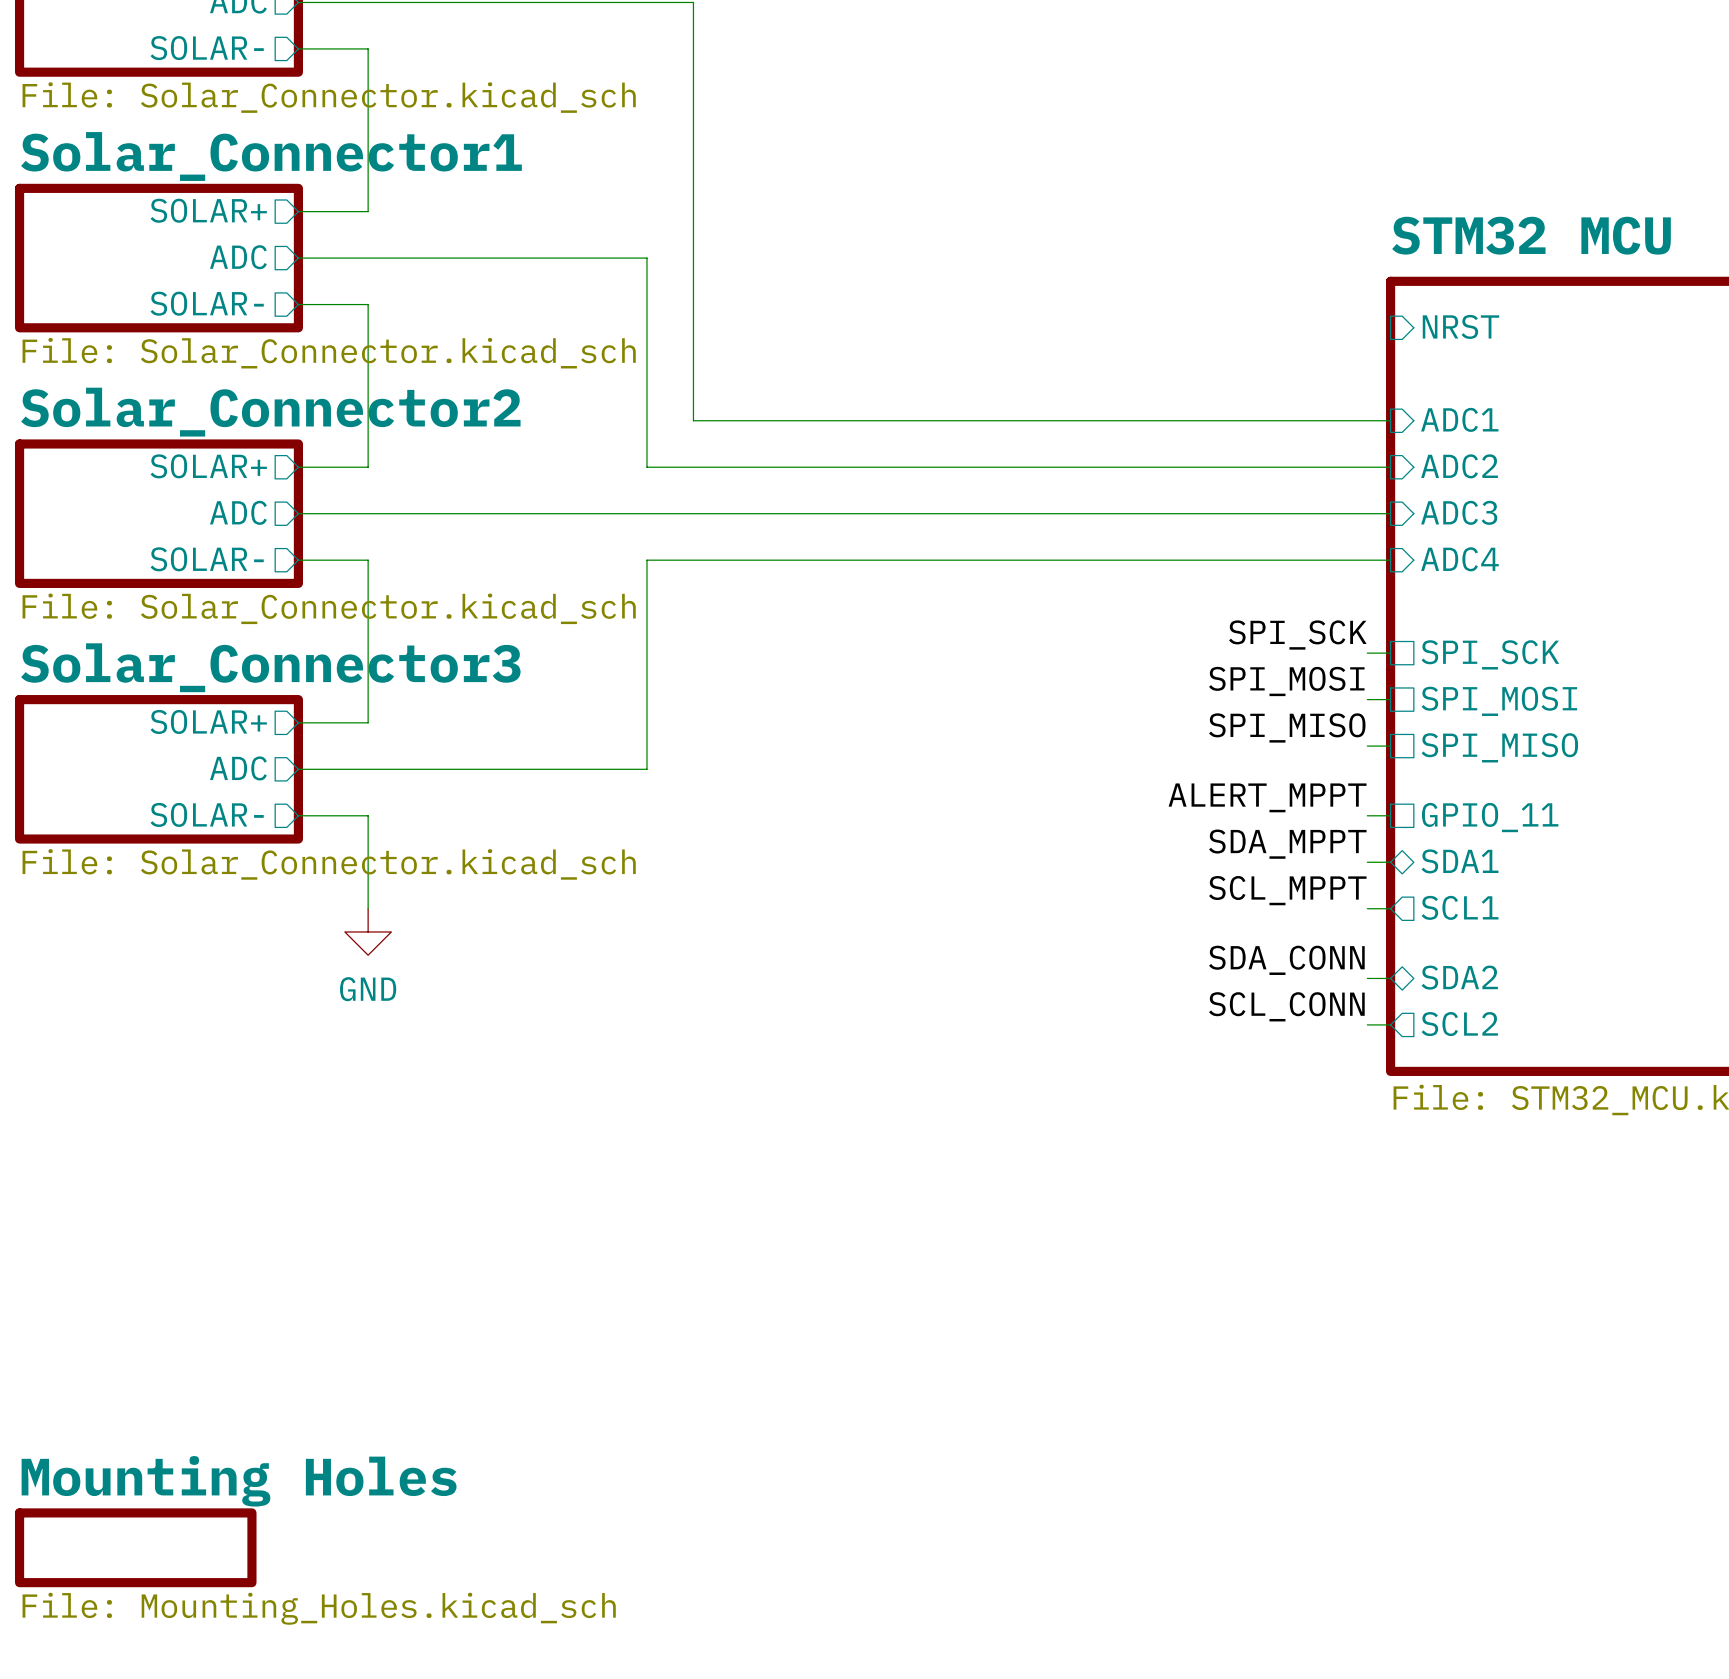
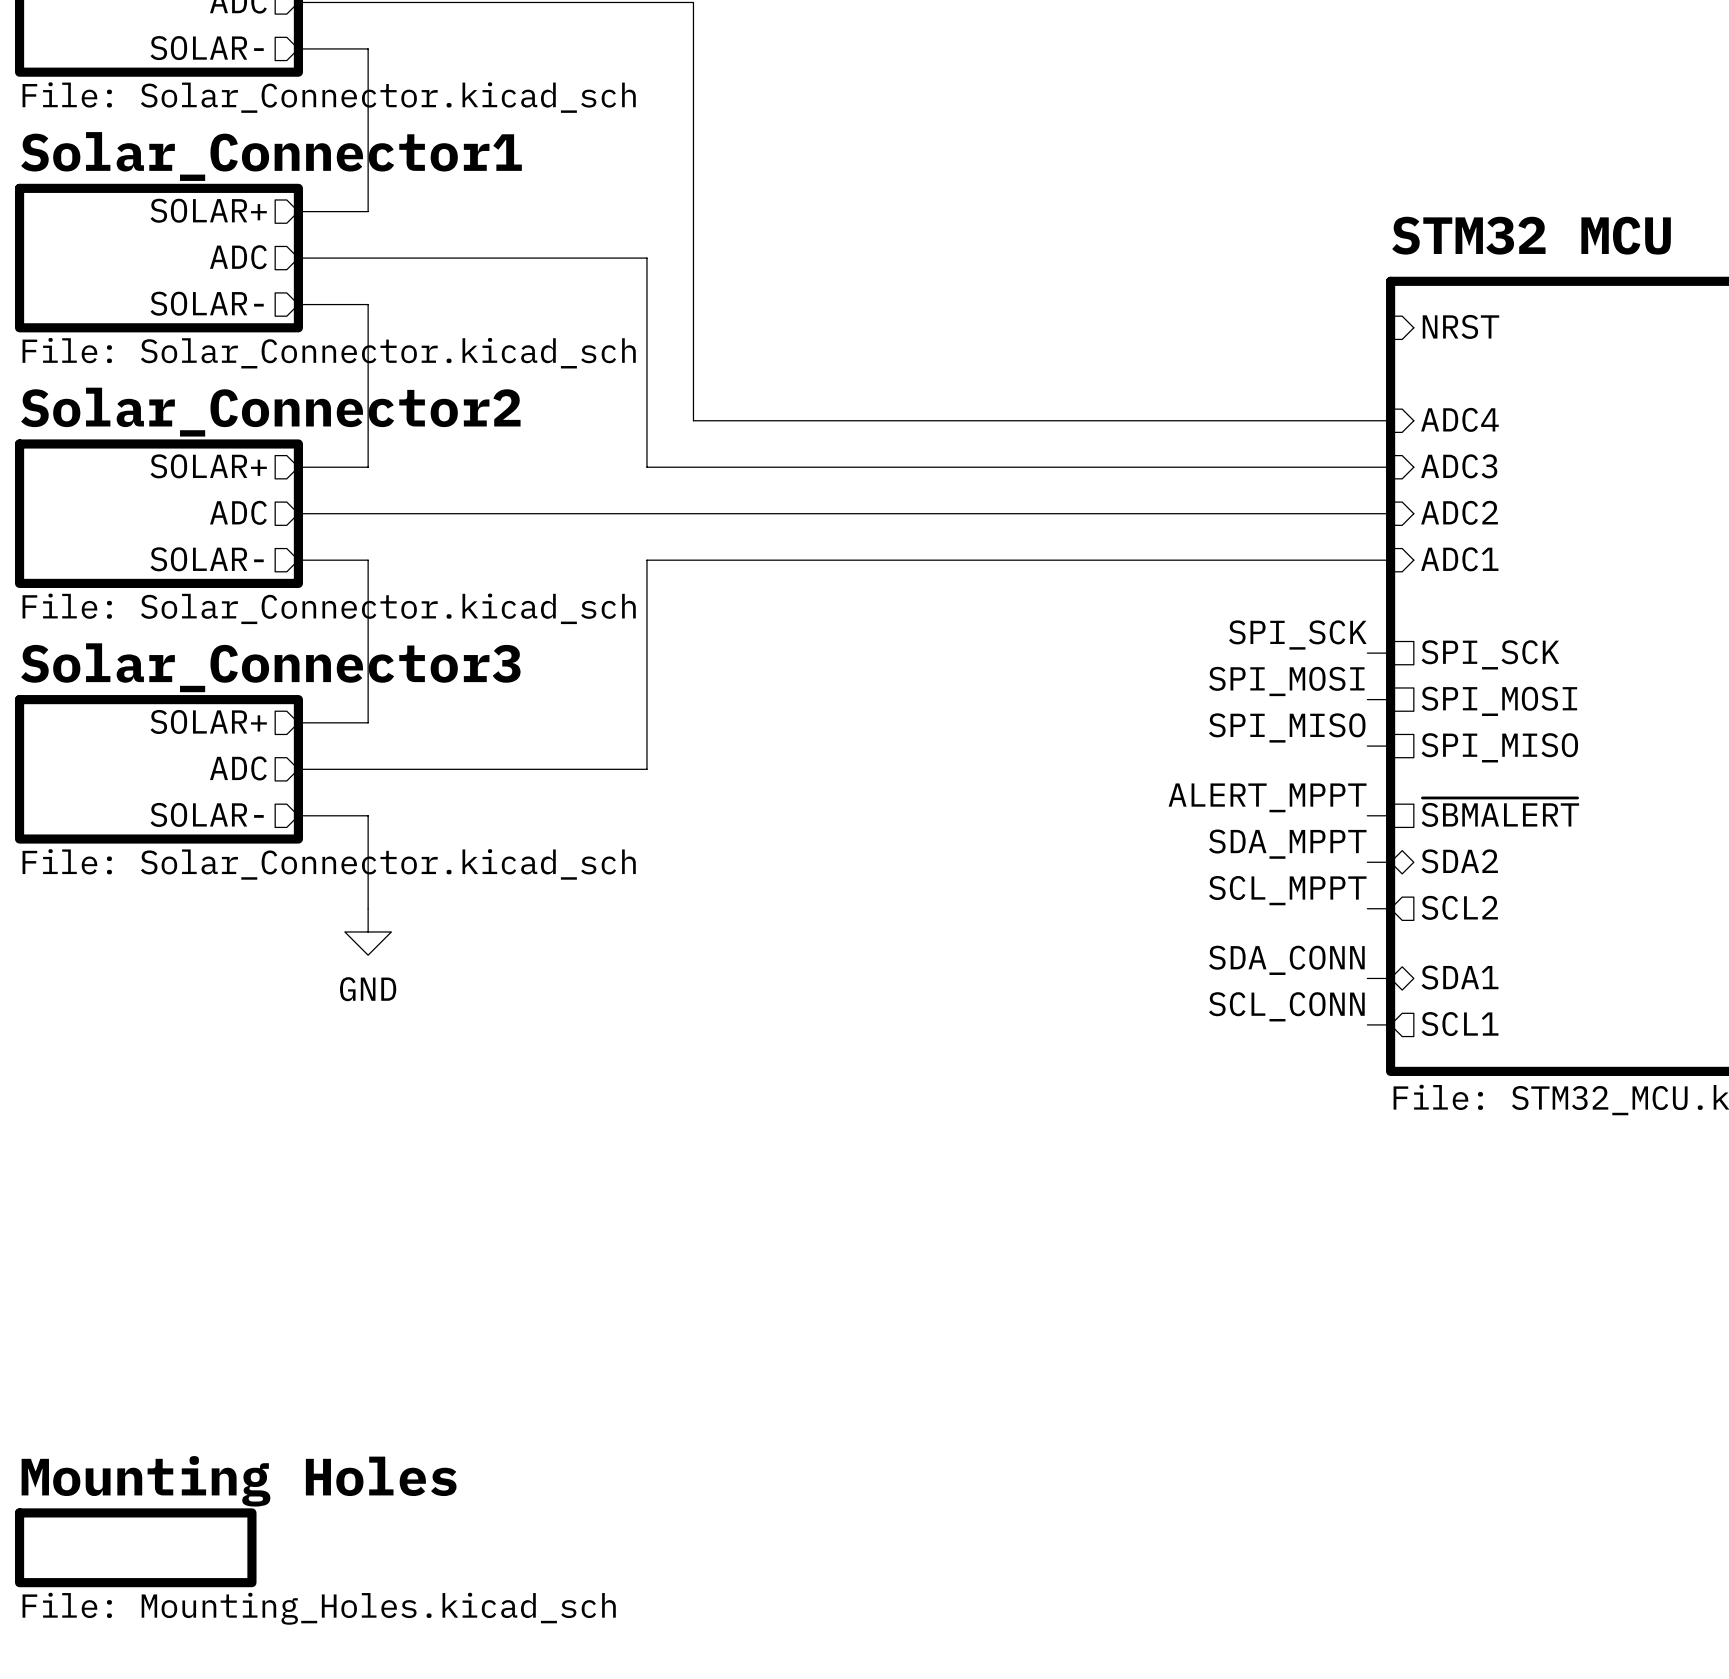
sheet pin: ADC1 (1459, 419) -> ADC4 (1459, 419)
sheet pin: ADC2 (1459, 466) -> ADC3 (1459, 466)
sheet pin: ADC3 (1459, 512) -> ADC2 (1459, 512)
sheet pin: ADC4 (1459, 559) -> ADC1 (1459, 559)
sheet pin: GPIO_11 (1490, 817) -> ~{SBMALERT} (1500, 812)
sheet pin: SDA1 (1460, 861) -> SDA2 (1459, 861)
sheet pin: SCL1 (1460, 907) -> SCL2 (1459, 907)
sheet pin: SDA2 (1459, 977) -> SDA1 (1460, 977)
sheet pin: SCL2 (1459, 1024) -> SCL1 (1460, 1024)

